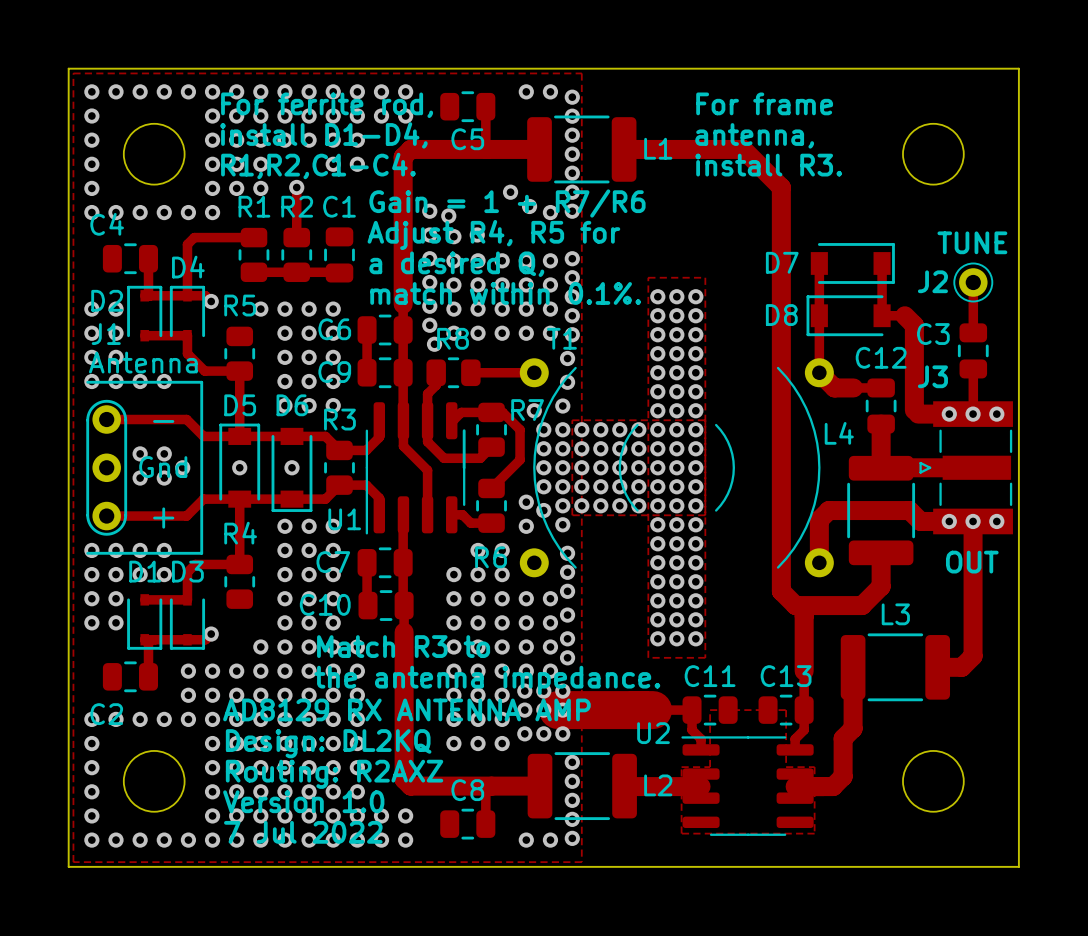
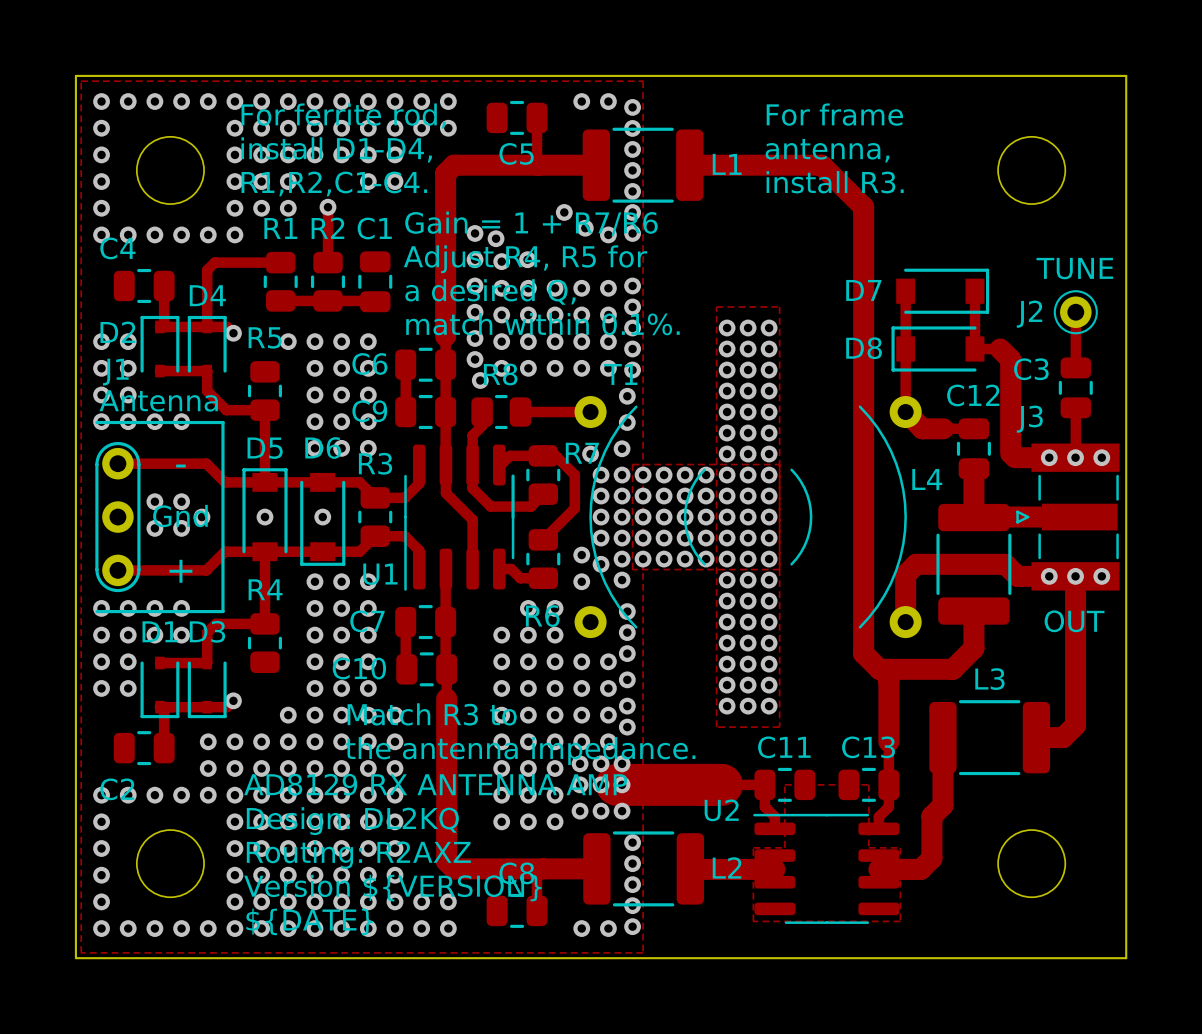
text: Version 1.0 (303, 801) -> Version ${VERSION} (392, 888)
text: 7 Jul 2022 (303, 832) -> ${DATE} (309, 921)

